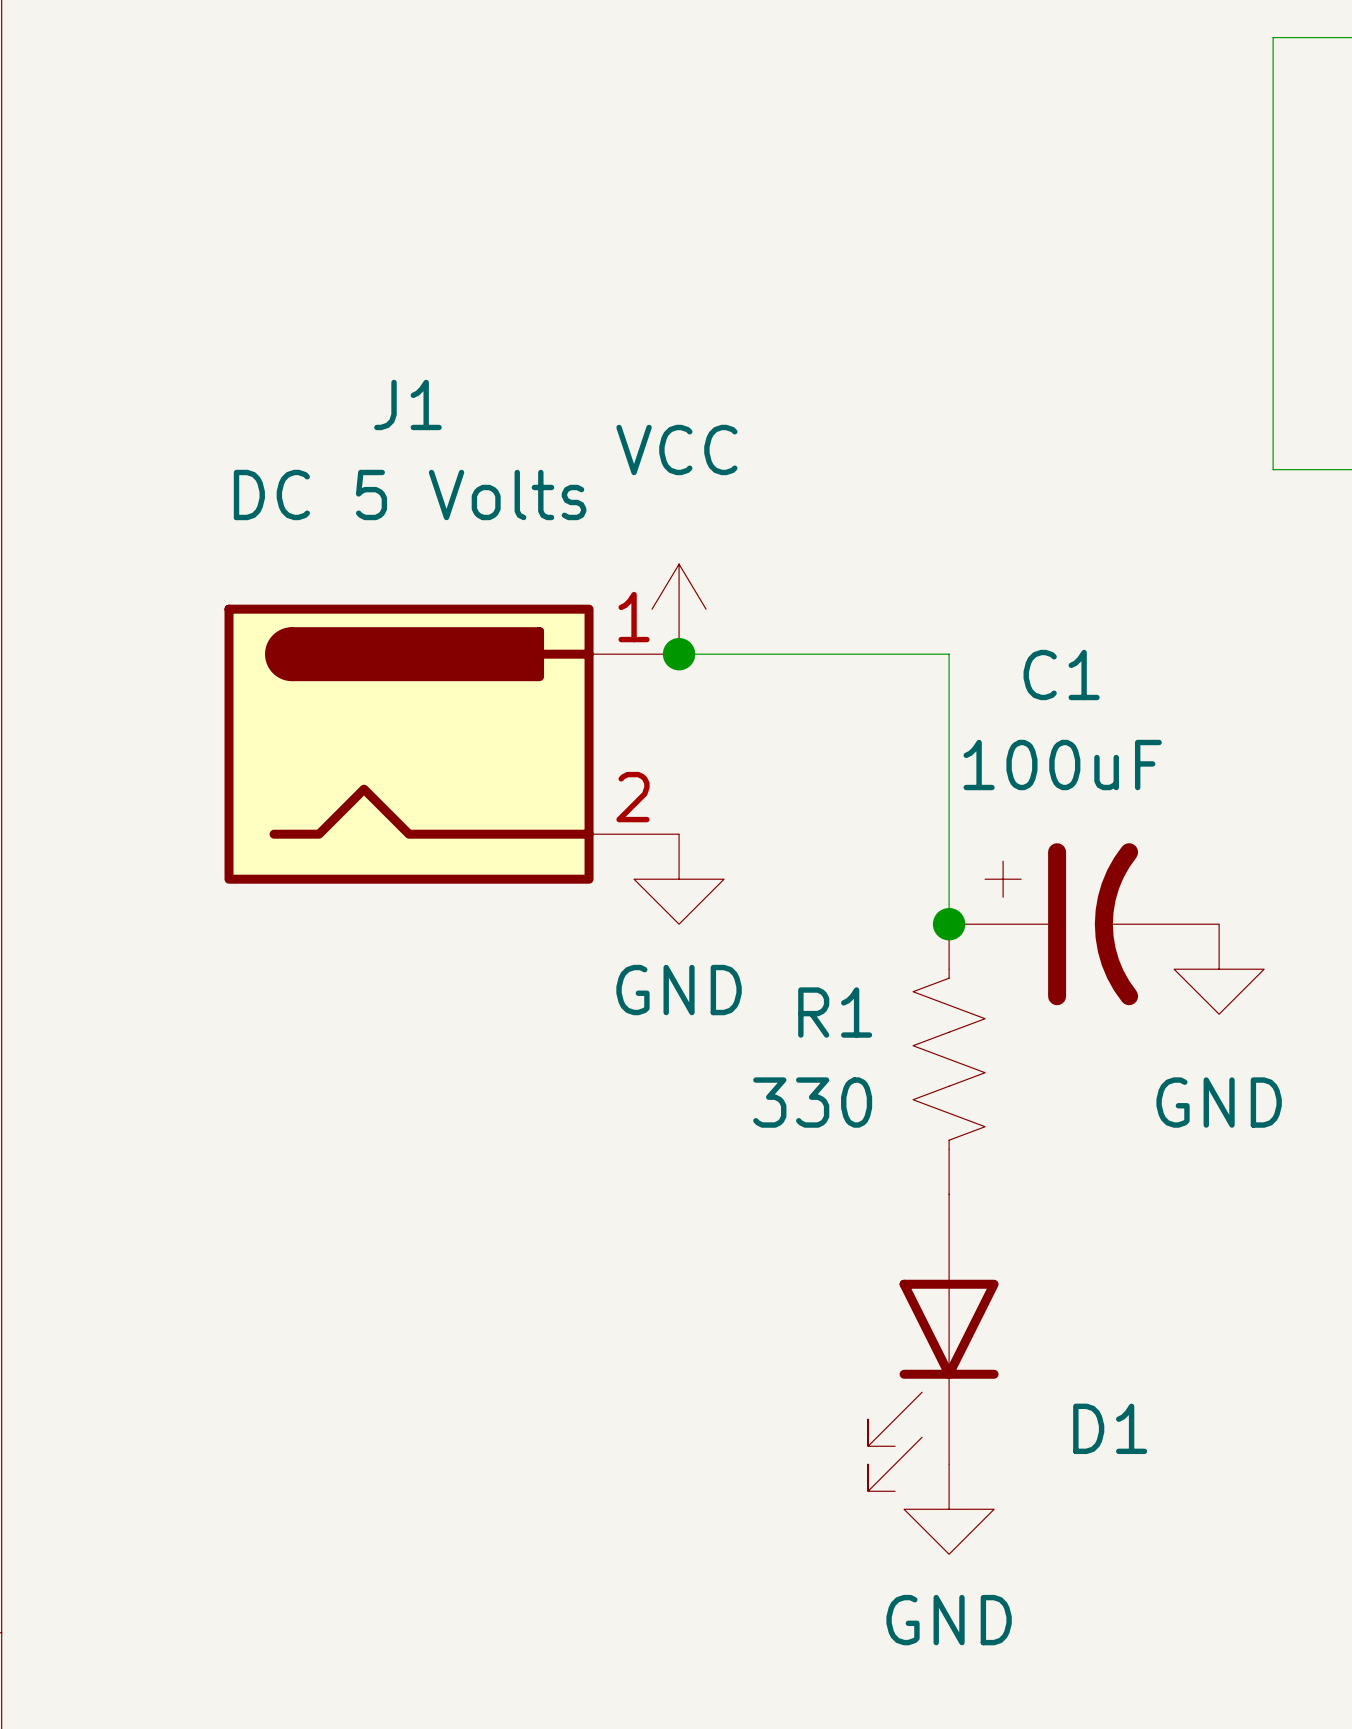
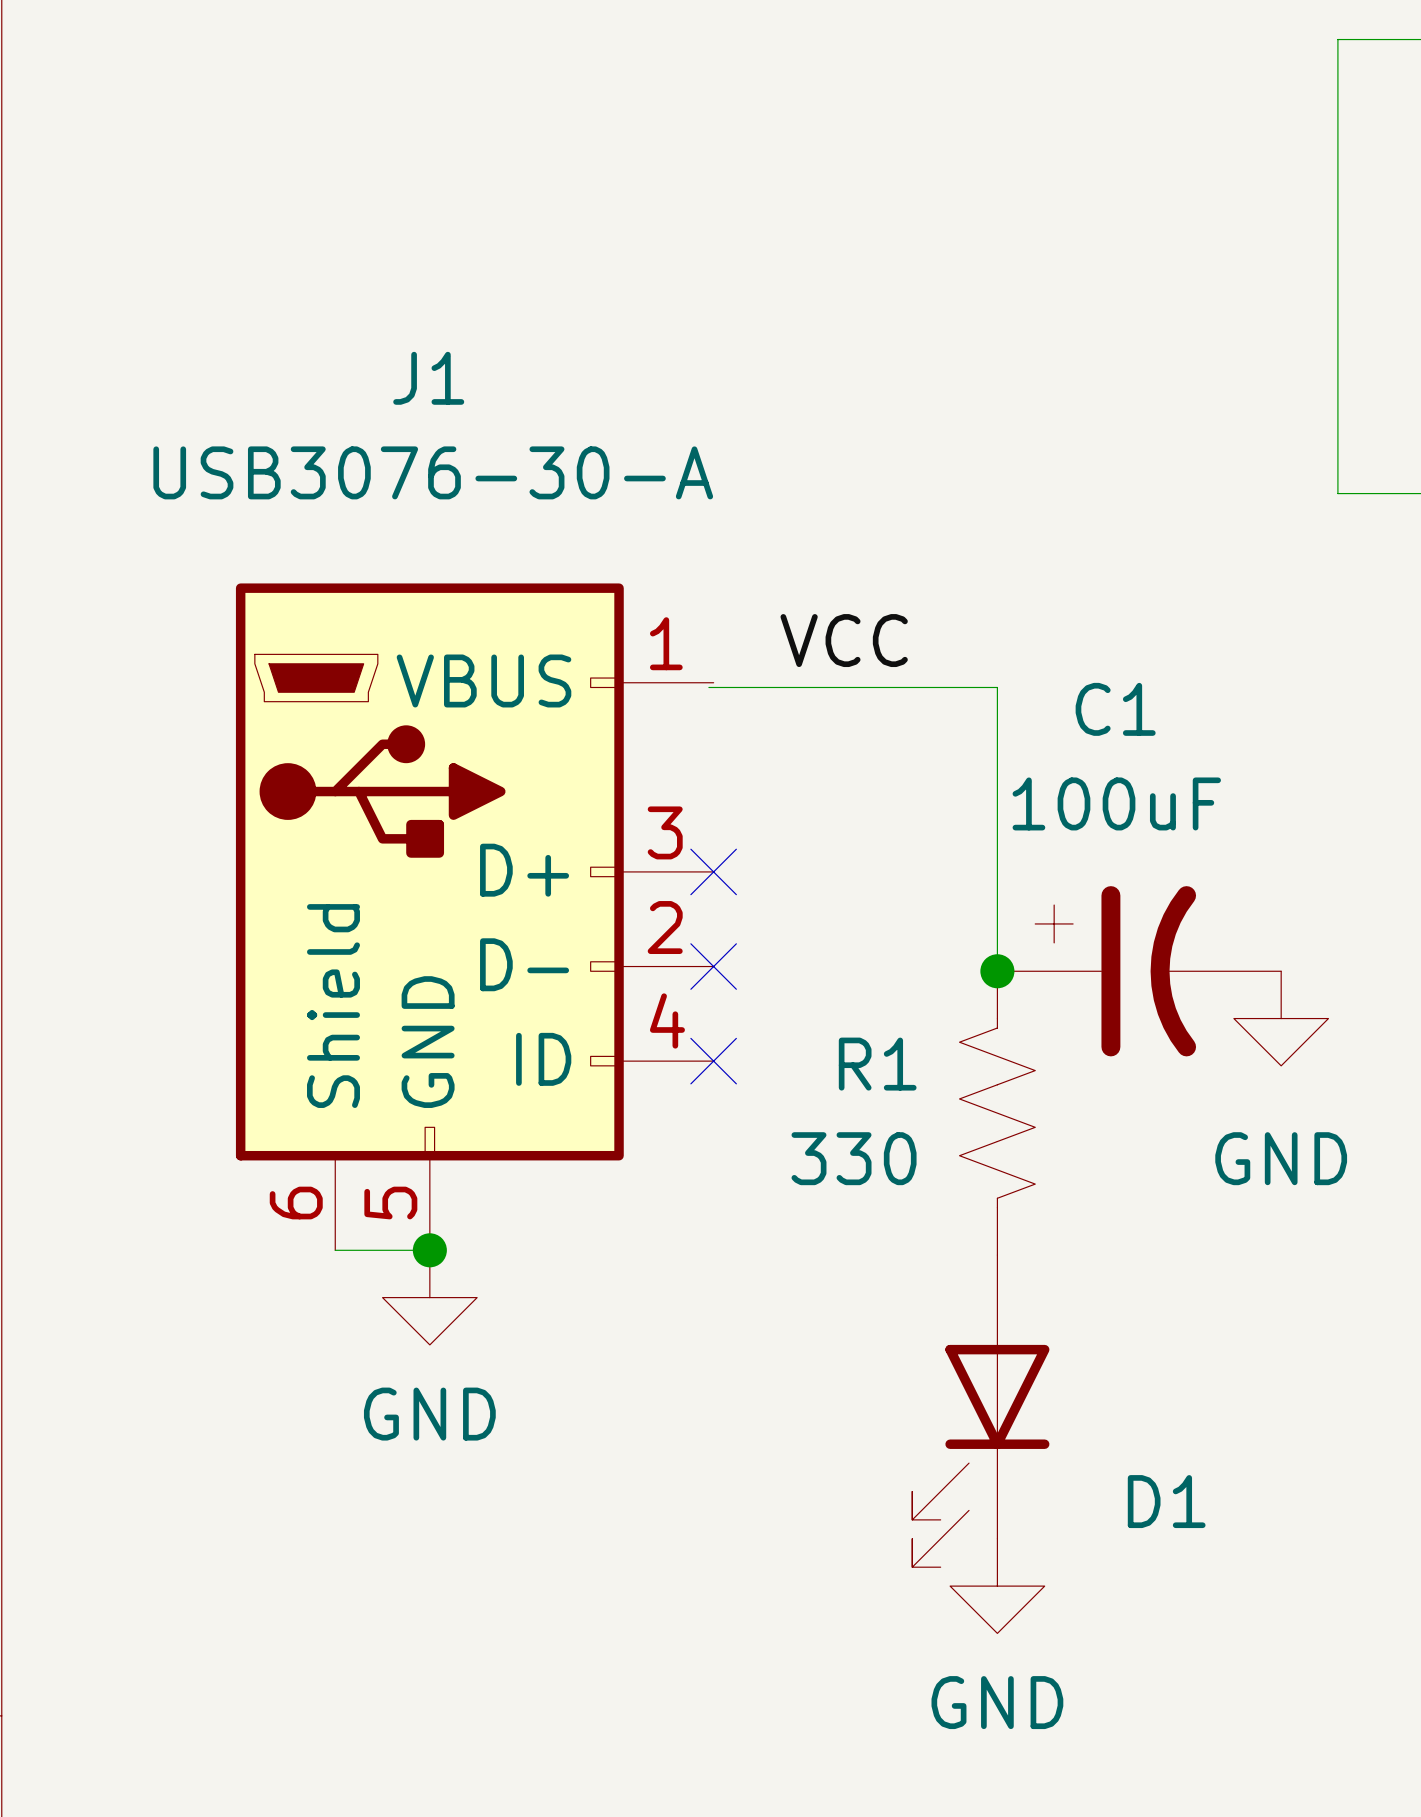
J1 name position: J1 (407, 404) -> J1 (428, 378)
J1 value: DC 5 Volts (410, 494) -> USB3076-30-A (433, 472)
J1 symbol: [224, 604, 680, 884] -> [235, 583, 714, 1251]
power symbol: VCC (679, 609) -> none
label: none -> VCC (844, 640)
junction: (679, 654) -> none
no-connect mark: none -> (713, 871)
power symbol position: GND (679, 879) -> GND (429, 1297)
no-connect mark: none -> (713, 966)
no-connect mark: none -> (713, 1061)
wire: none -> (335, 1250) (429, 1250)
junction: none -> (429, 1250)

